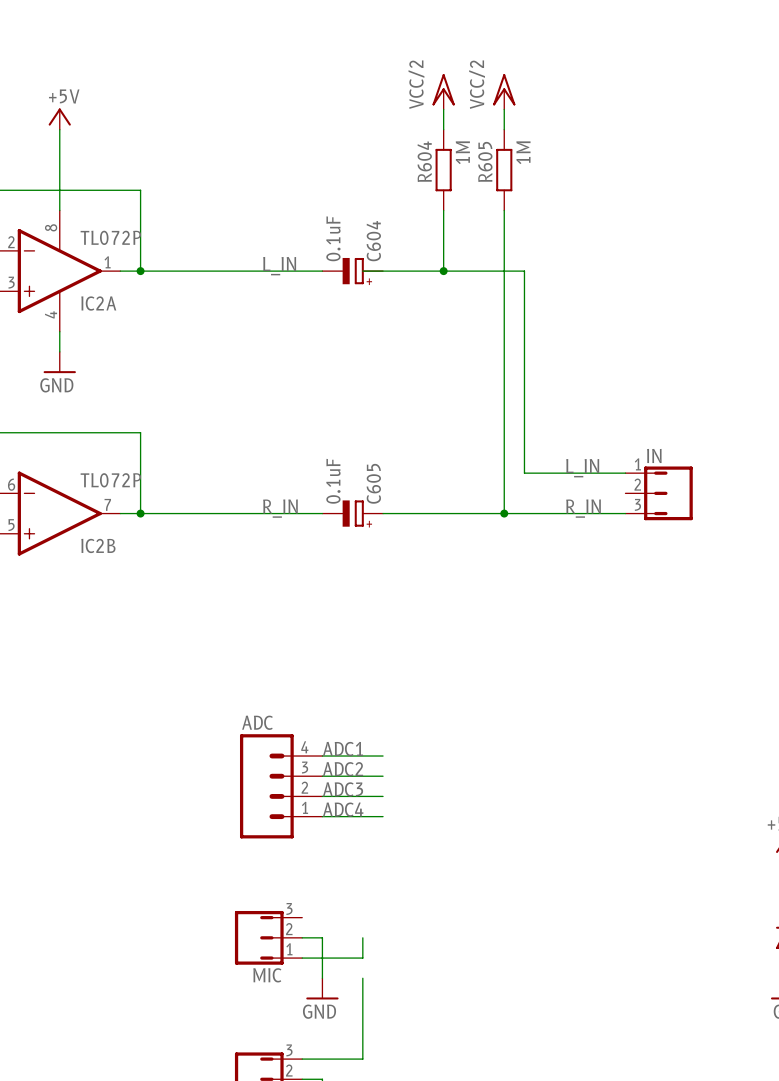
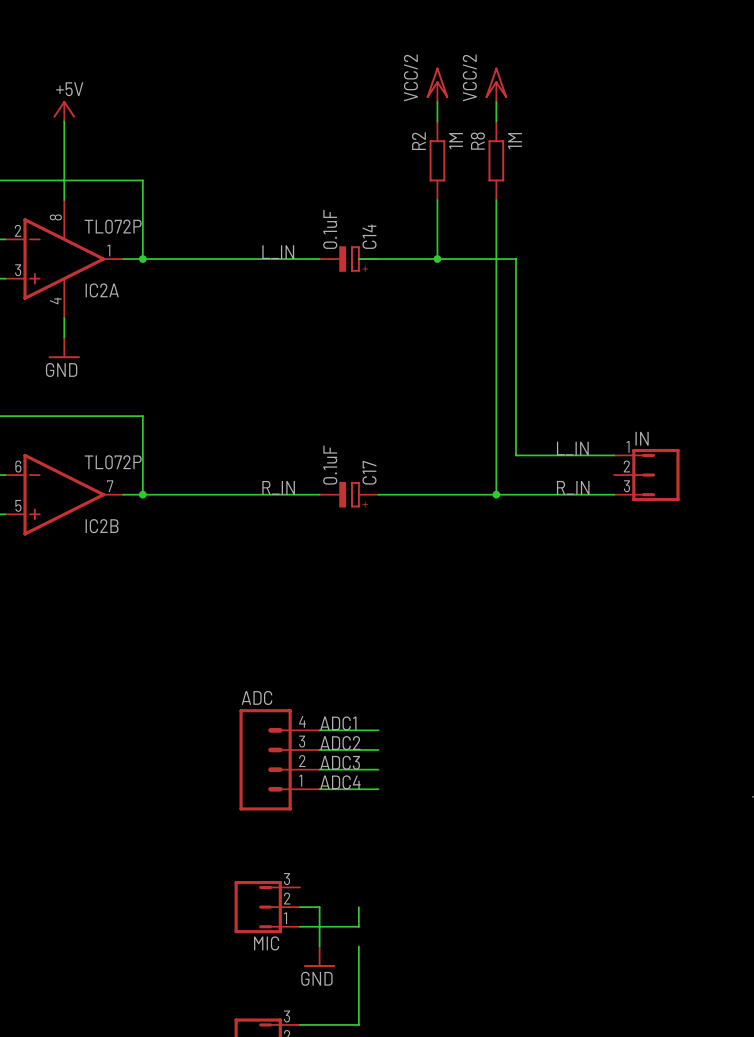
R604 name: R604 (424, 161) -> R2 (418, 141)
R605 name: R605 (485, 161) -> R8 (477, 141)
C604 name: C604 (373, 241) -> C14 (369, 236)
C605 name: C605 (373, 483) -> C17 (369, 472)

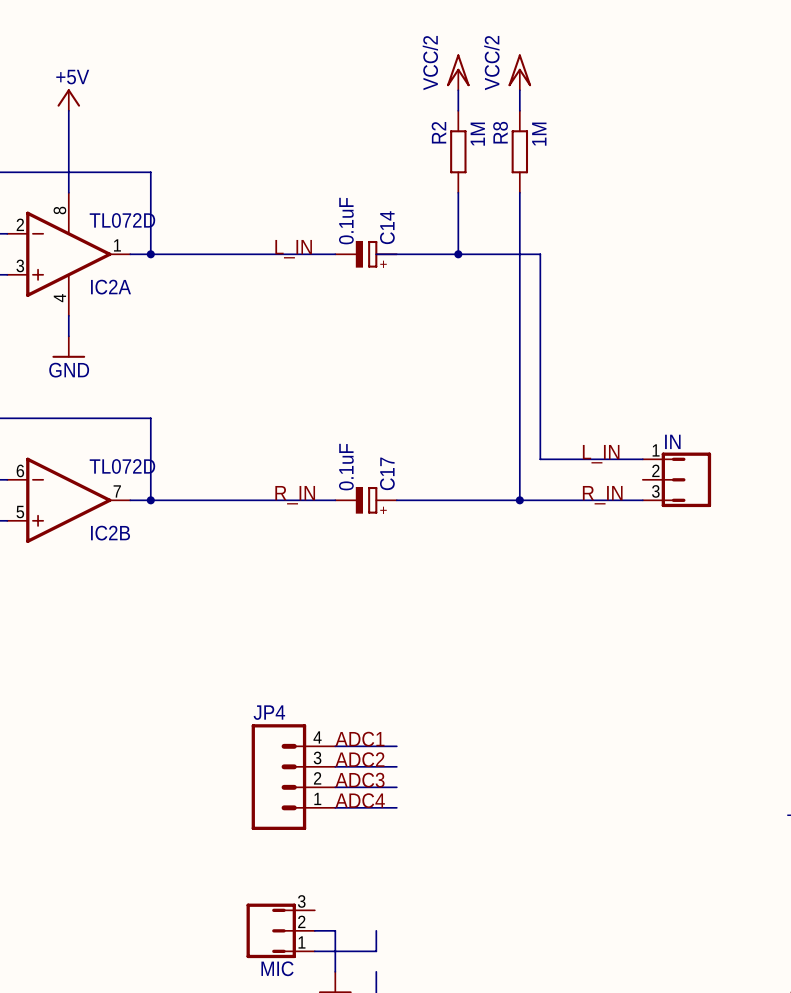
IC2A value: TL072P (113, 226) -> TL072D (122, 220)
IC2B value: TL072P (113, 462) -> TL072D (122, 466)
ADC name: ADC (256, 697) -> JP4 (269, 712)

